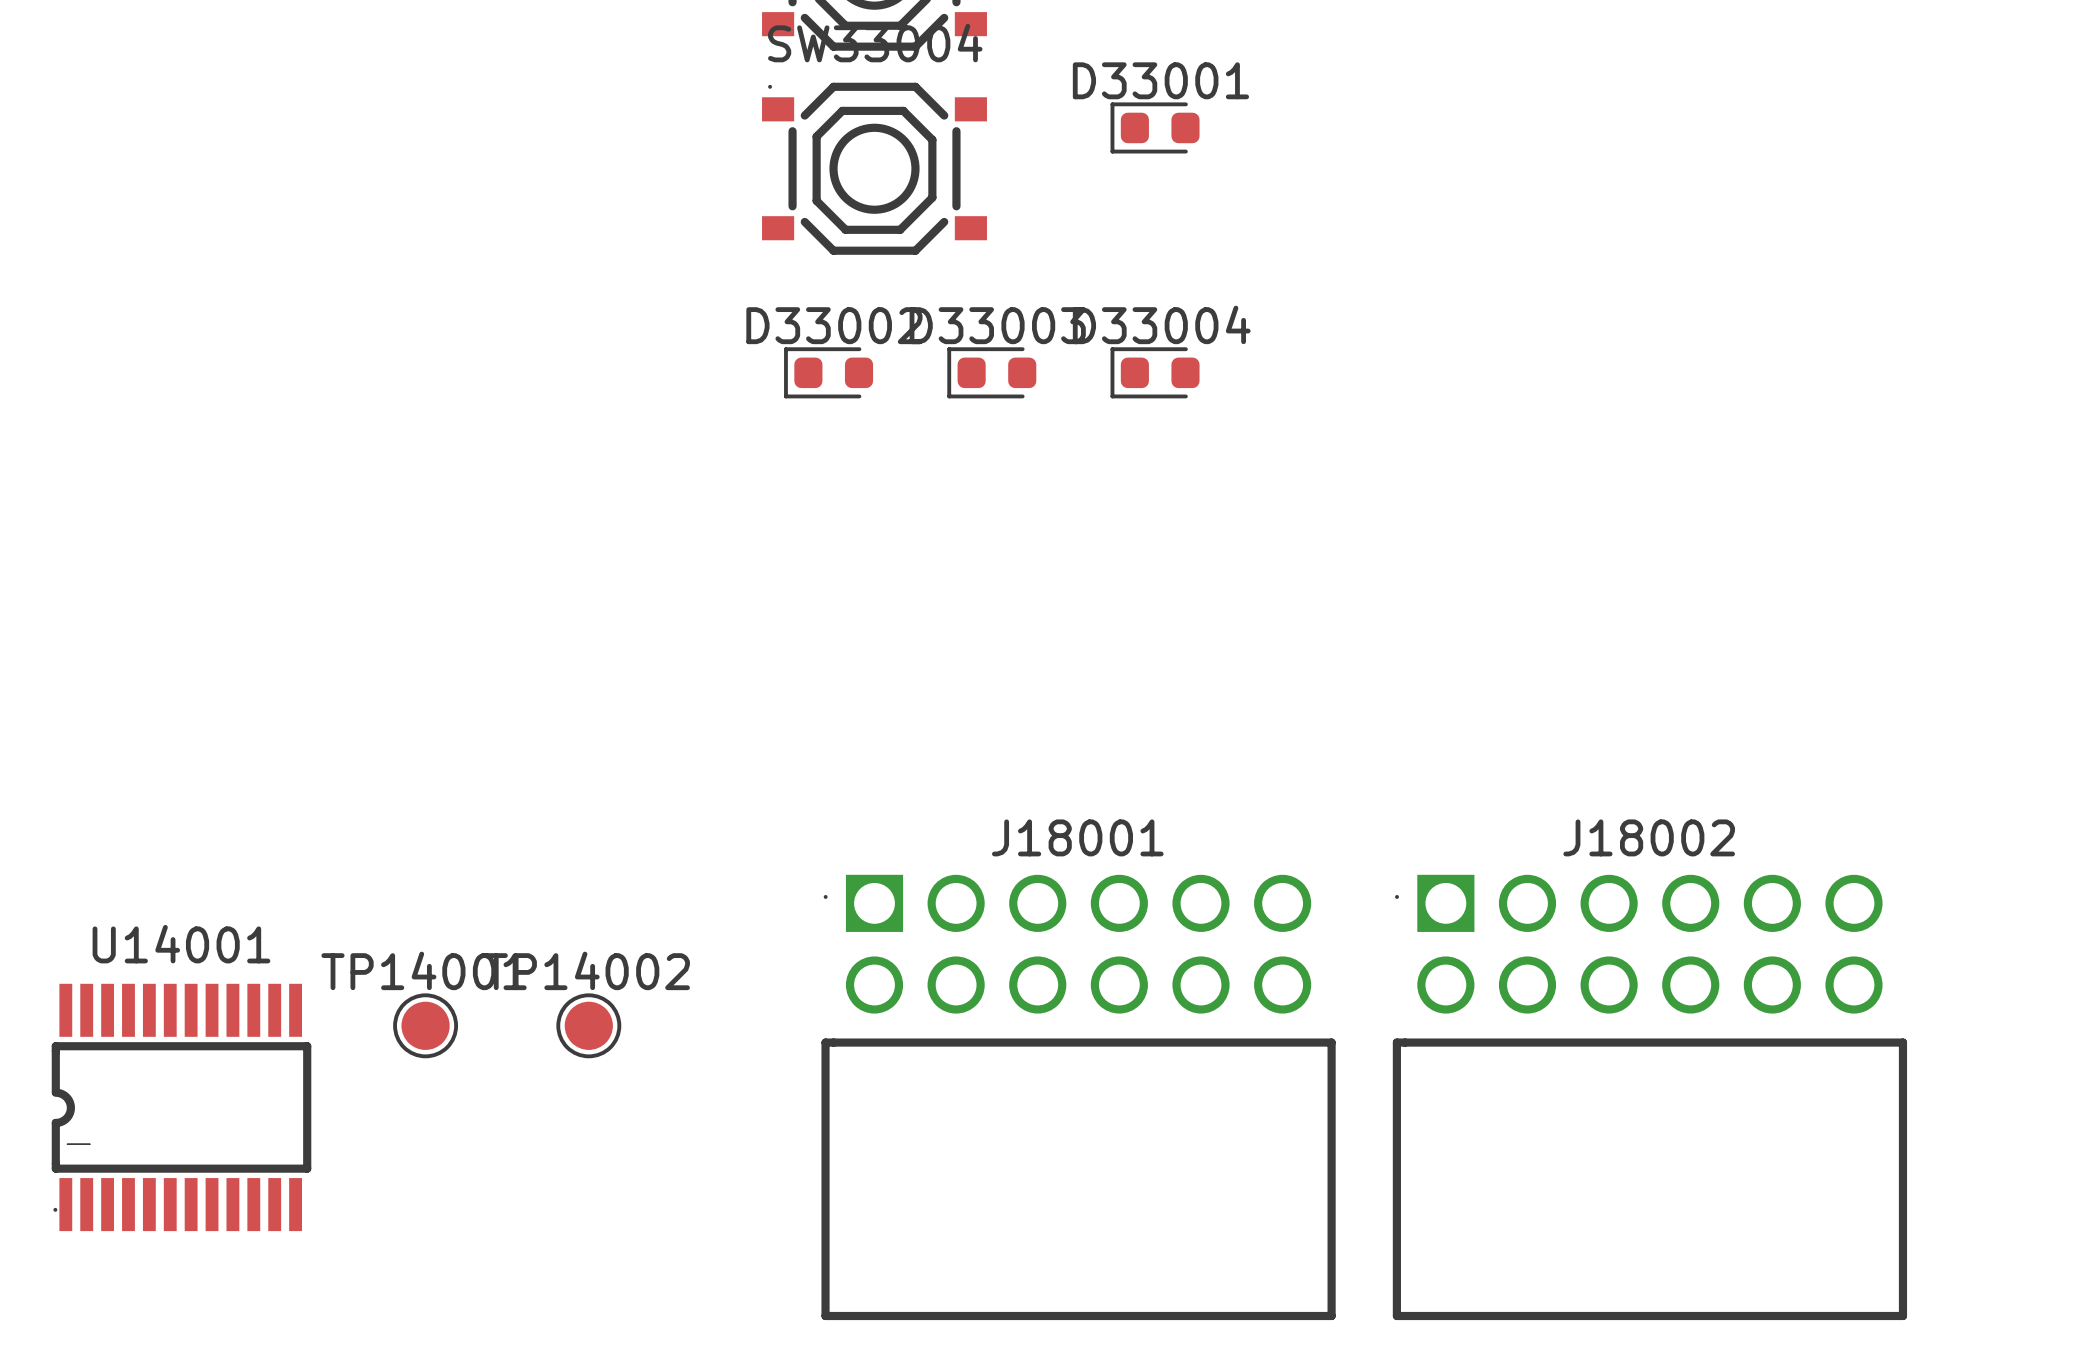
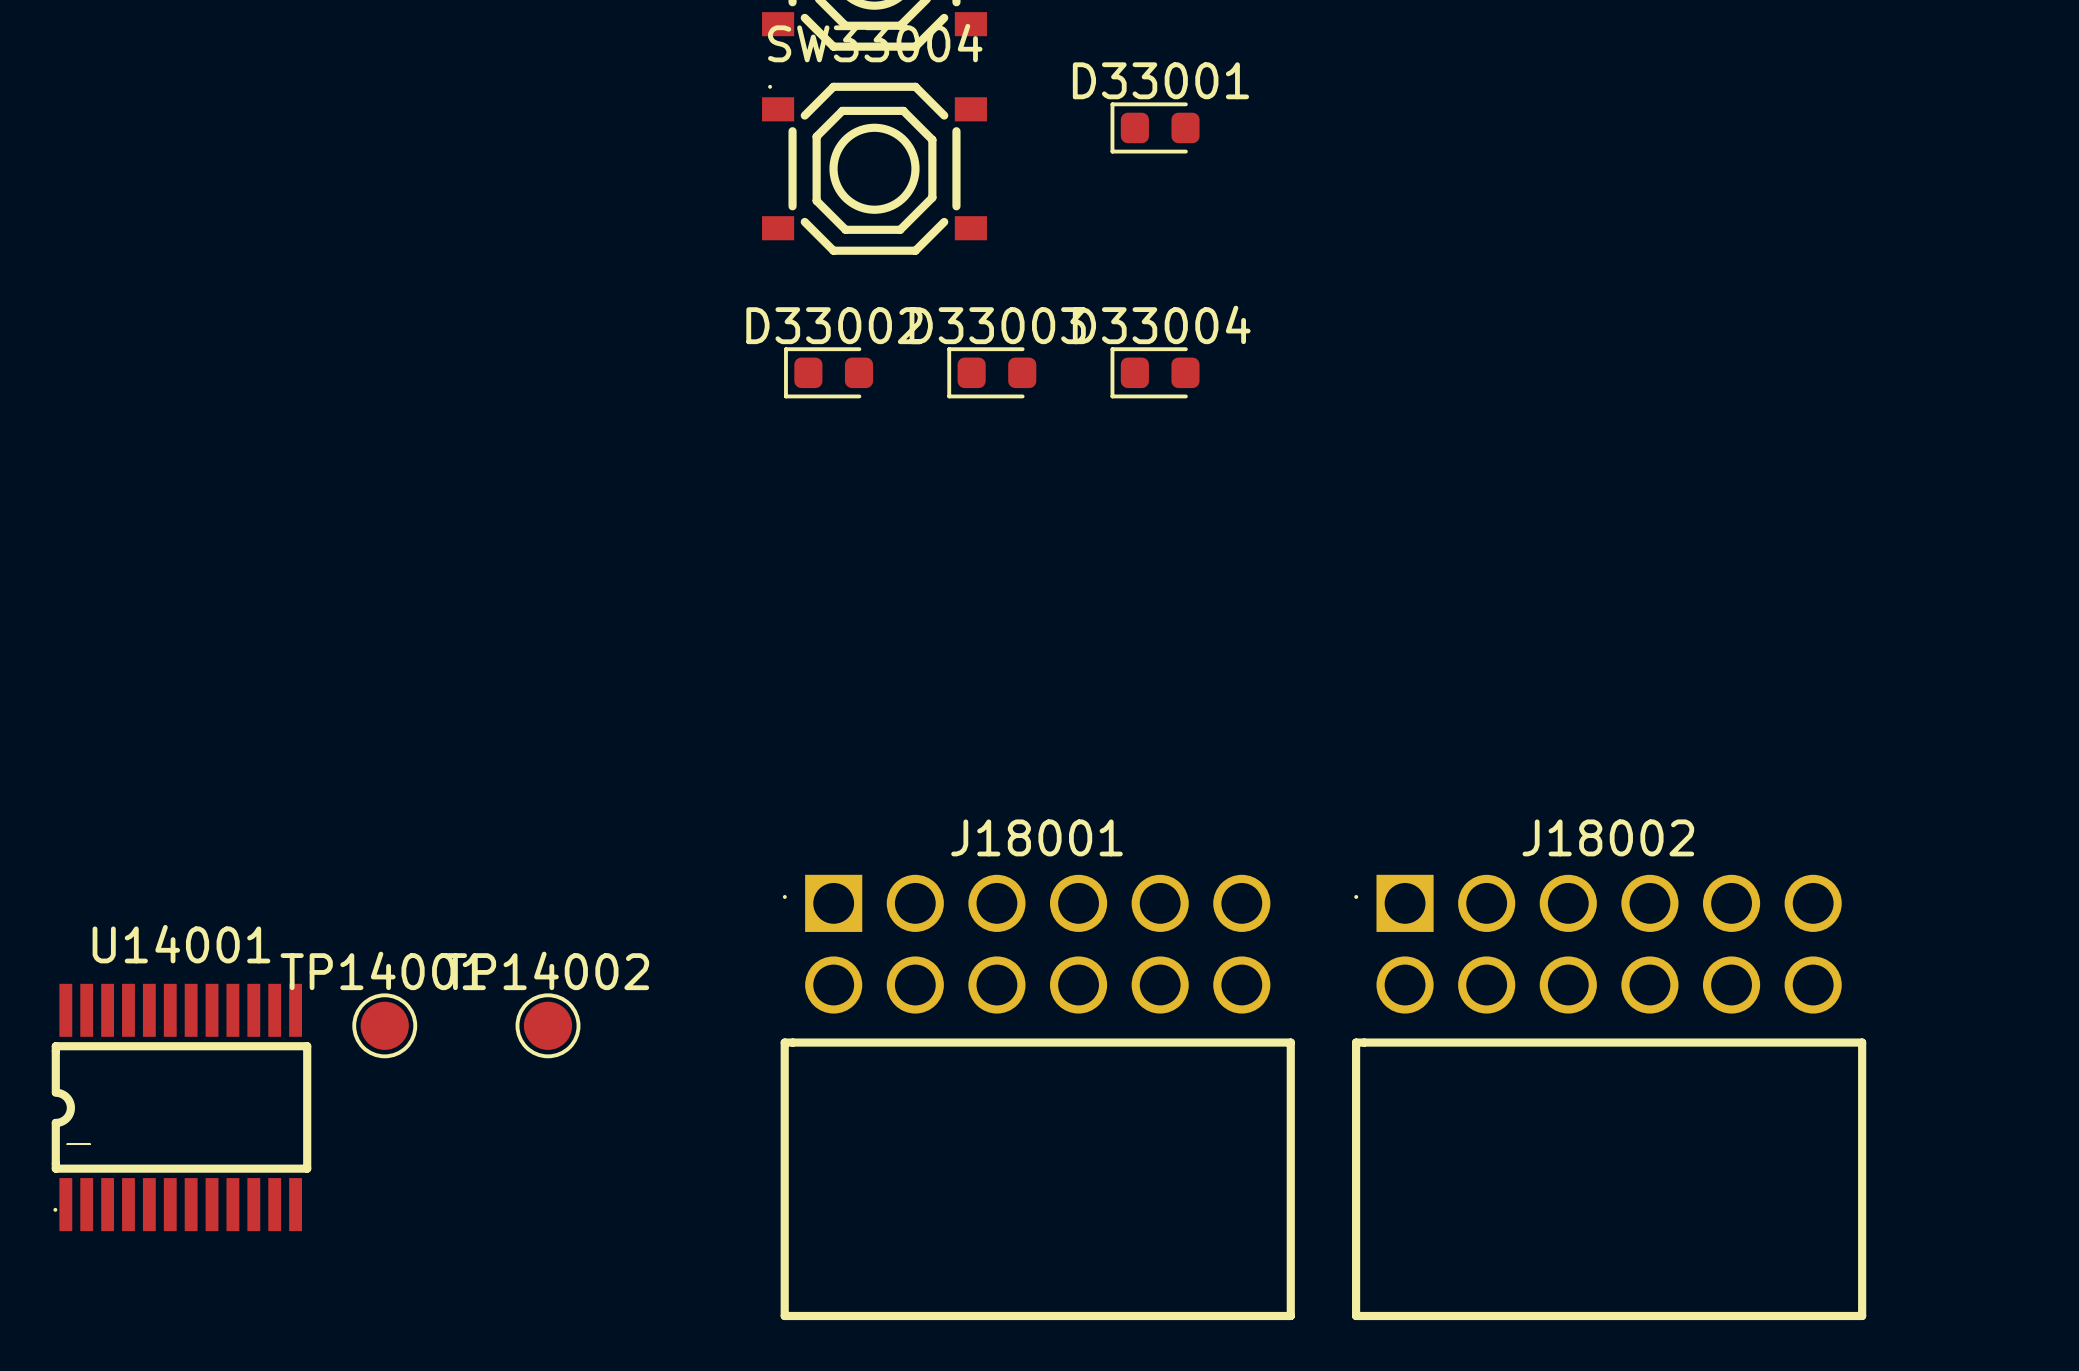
TP14001 position: (425, 1025) -> (384, 1025)
TP14002 position: (588, 1025) -> (548, 1025)
J18001 position: (1078, 1097) -> (1037, 1097)
J18002 position: (1649, 1097) -> (1609, 1097)

